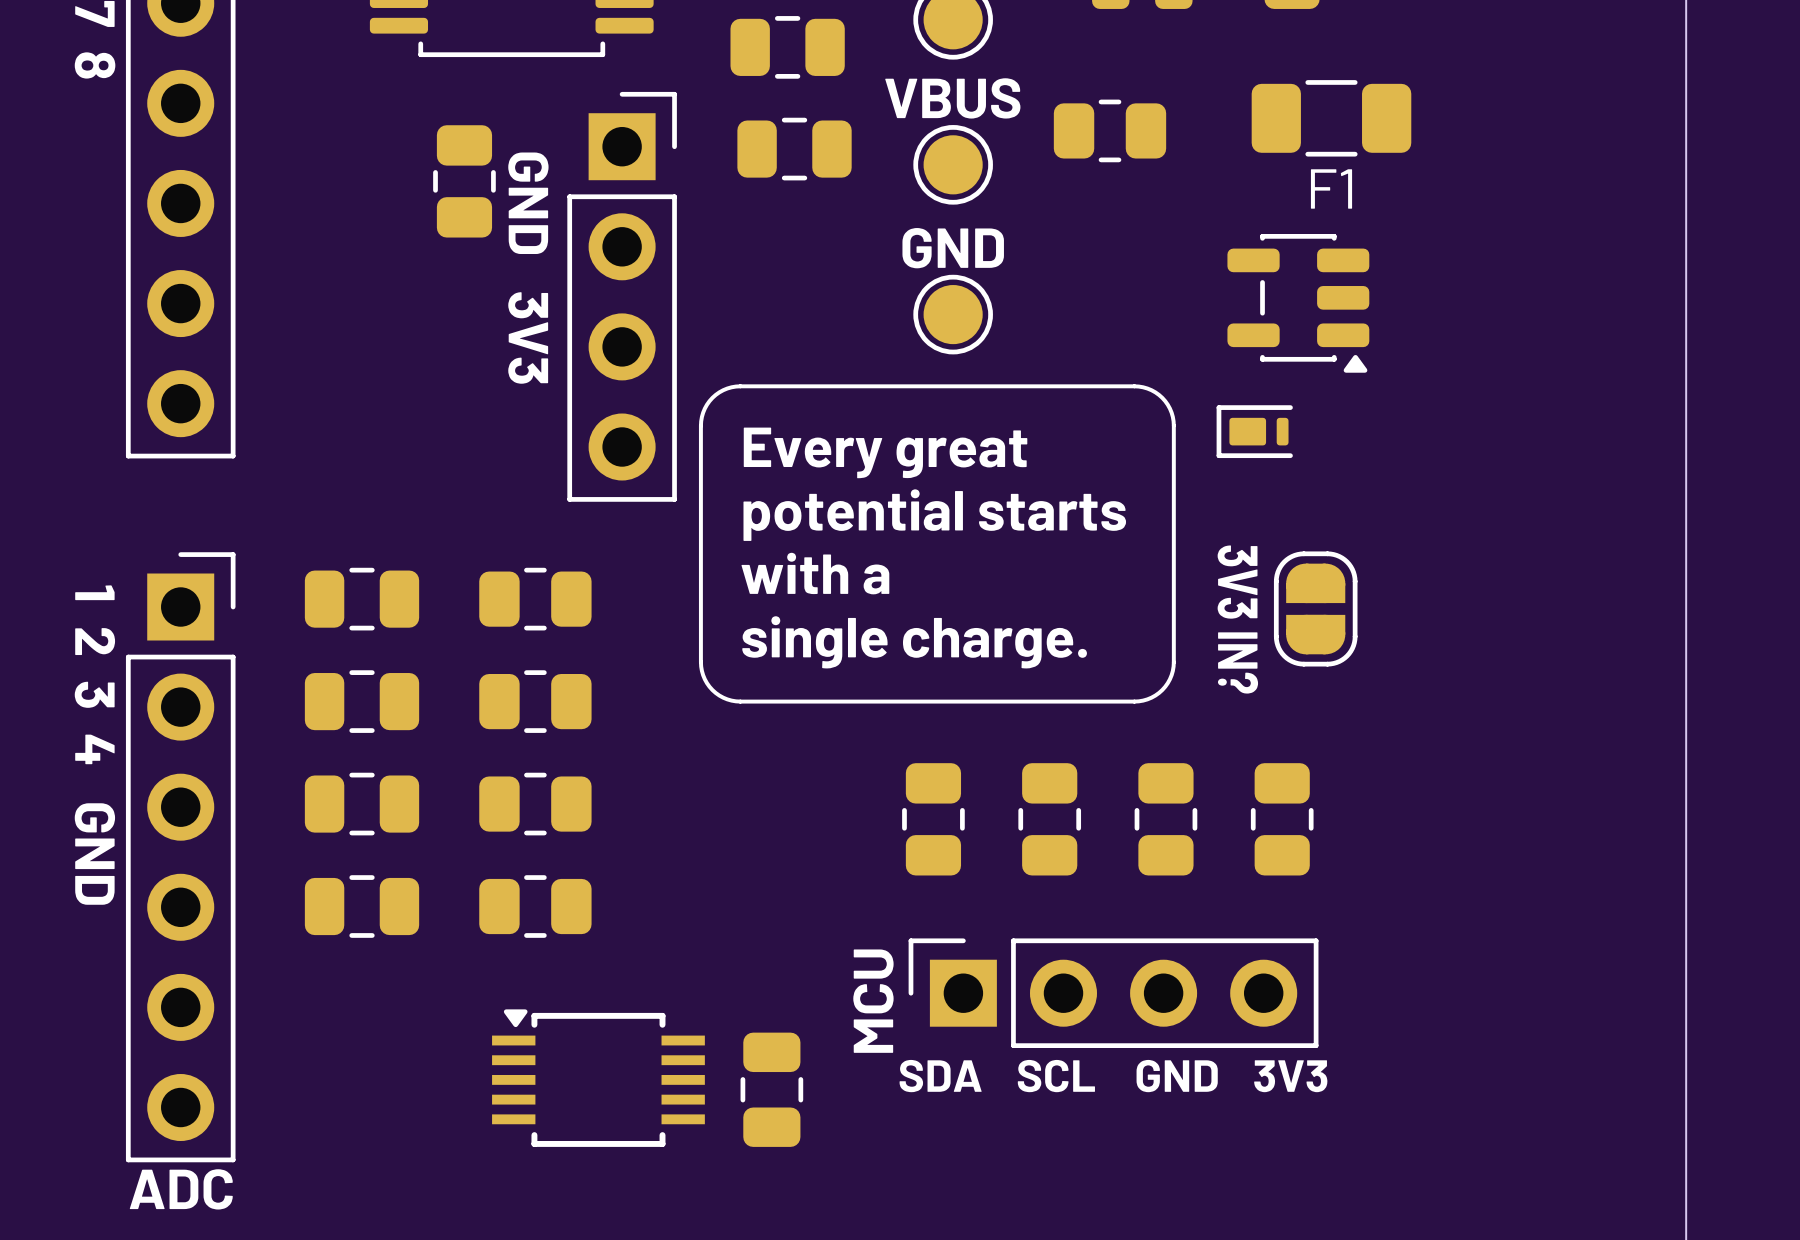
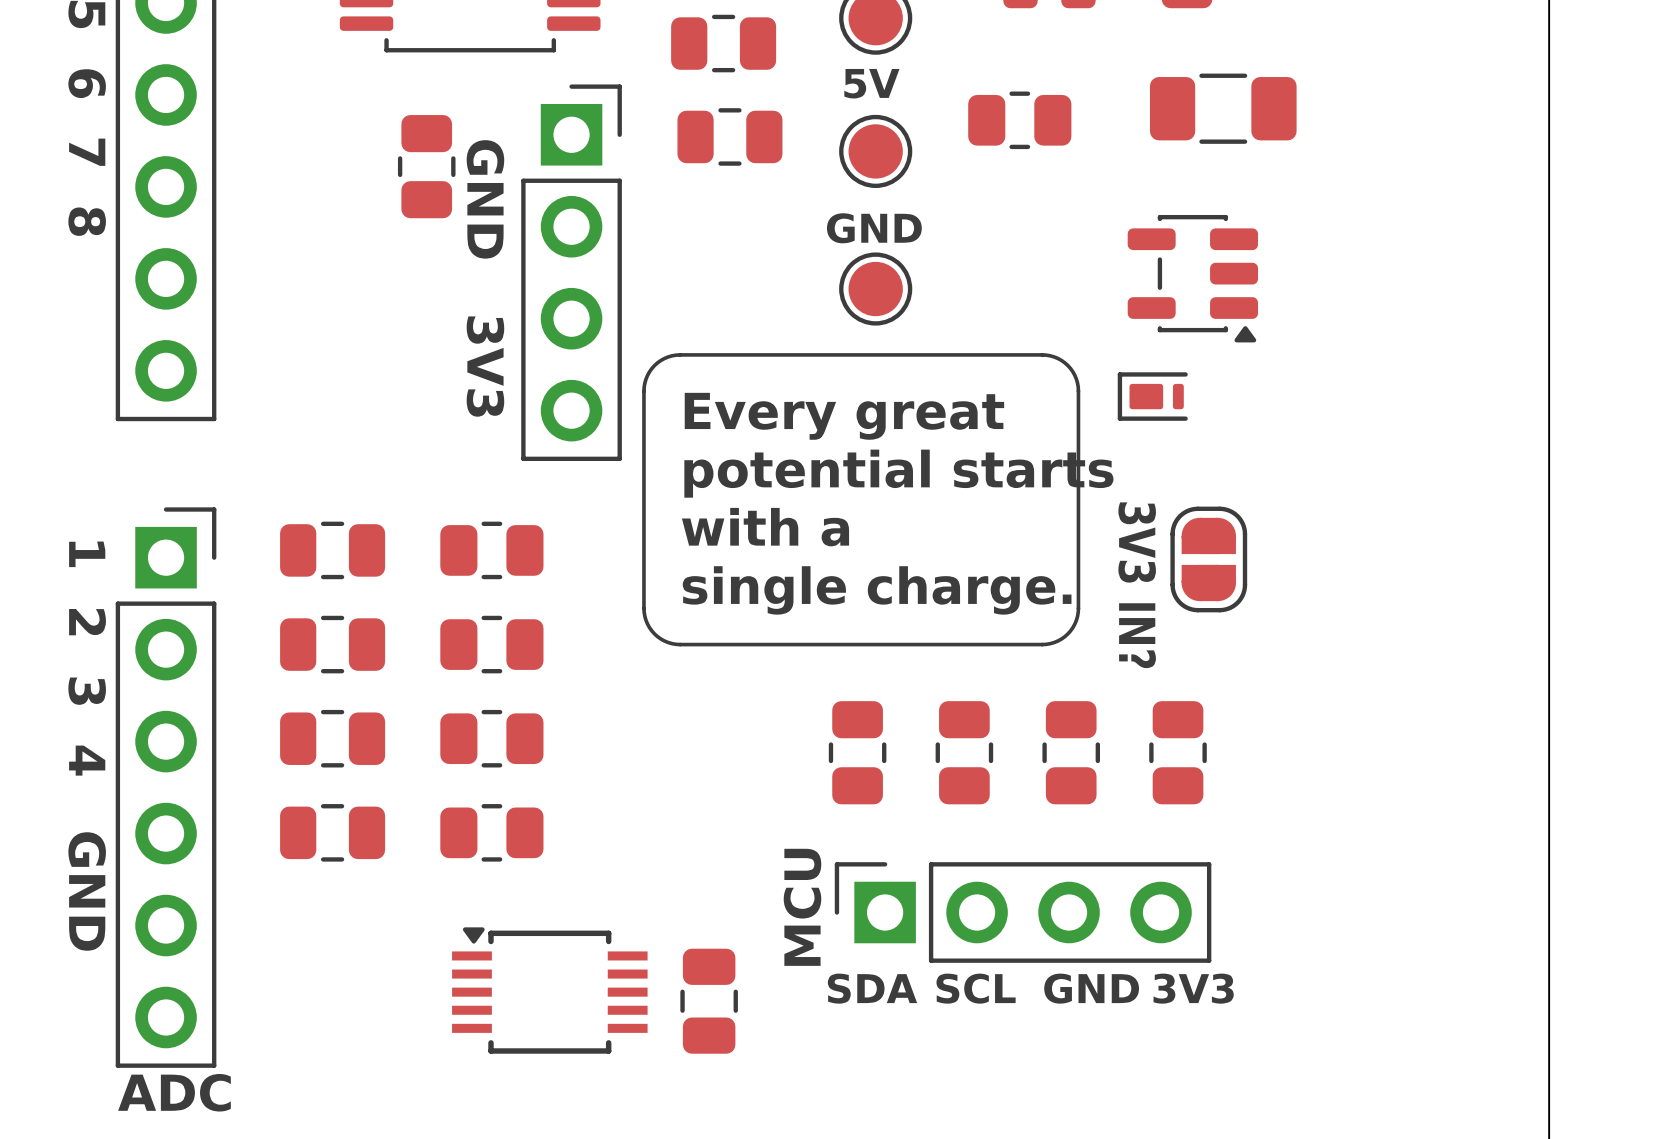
text: none -> 5V (871, 83)
VBUS name: VBUS (952, 98) -> none
F1 name: F1 (1331, 188) -> none
text: none -> GND (874, 228)
GND name: GND (953, 248) -> none

